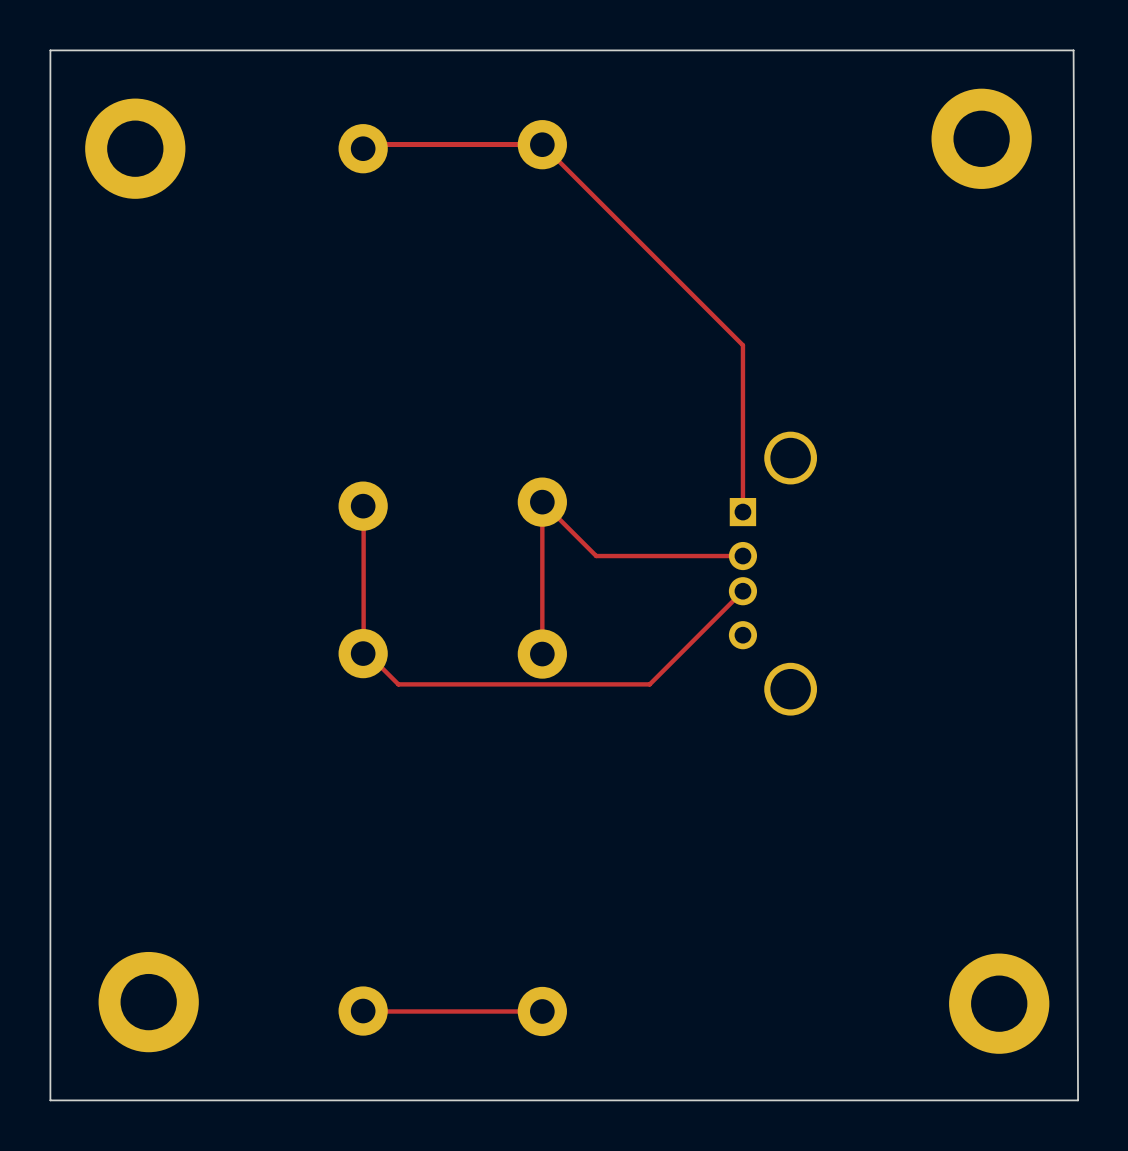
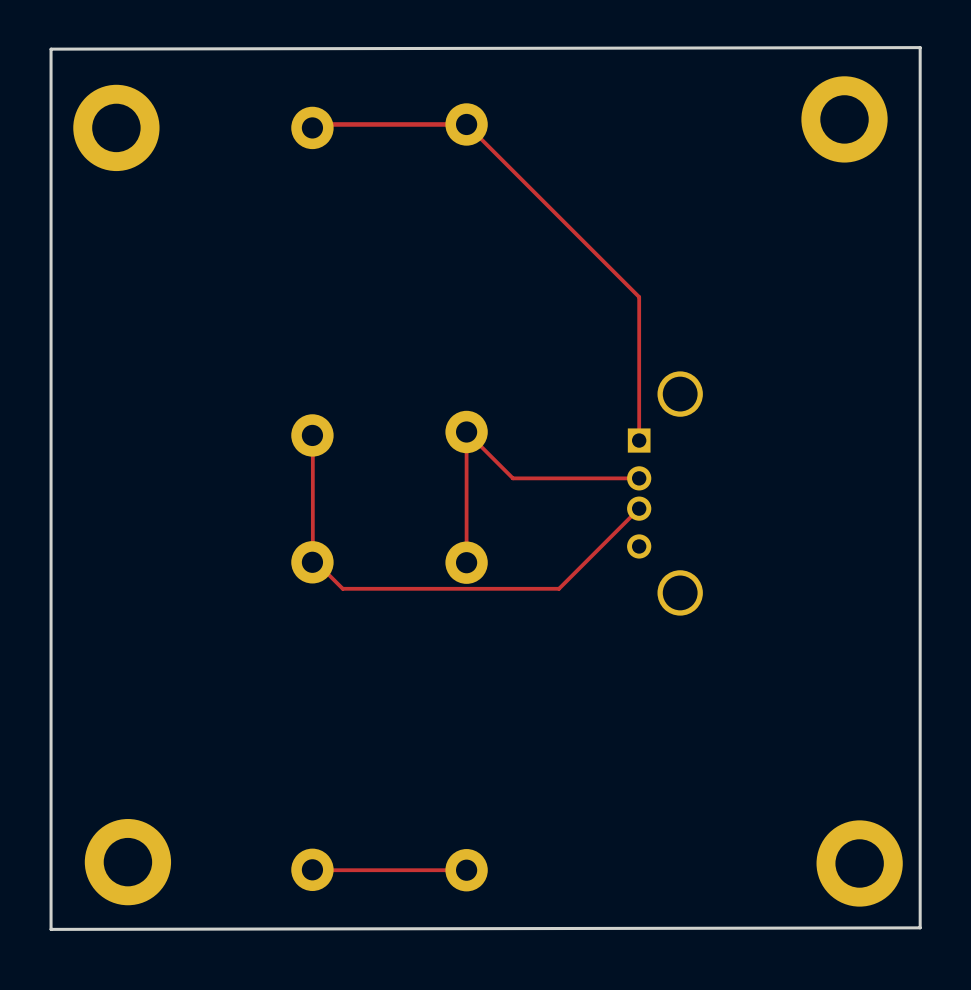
board edge: (1073, 50) (1078, 1100) (50, 1100) (50, 50) (1073, 50) -> (920, 47) (920, 927) (51, 929) (51, 49) (920, 47)

